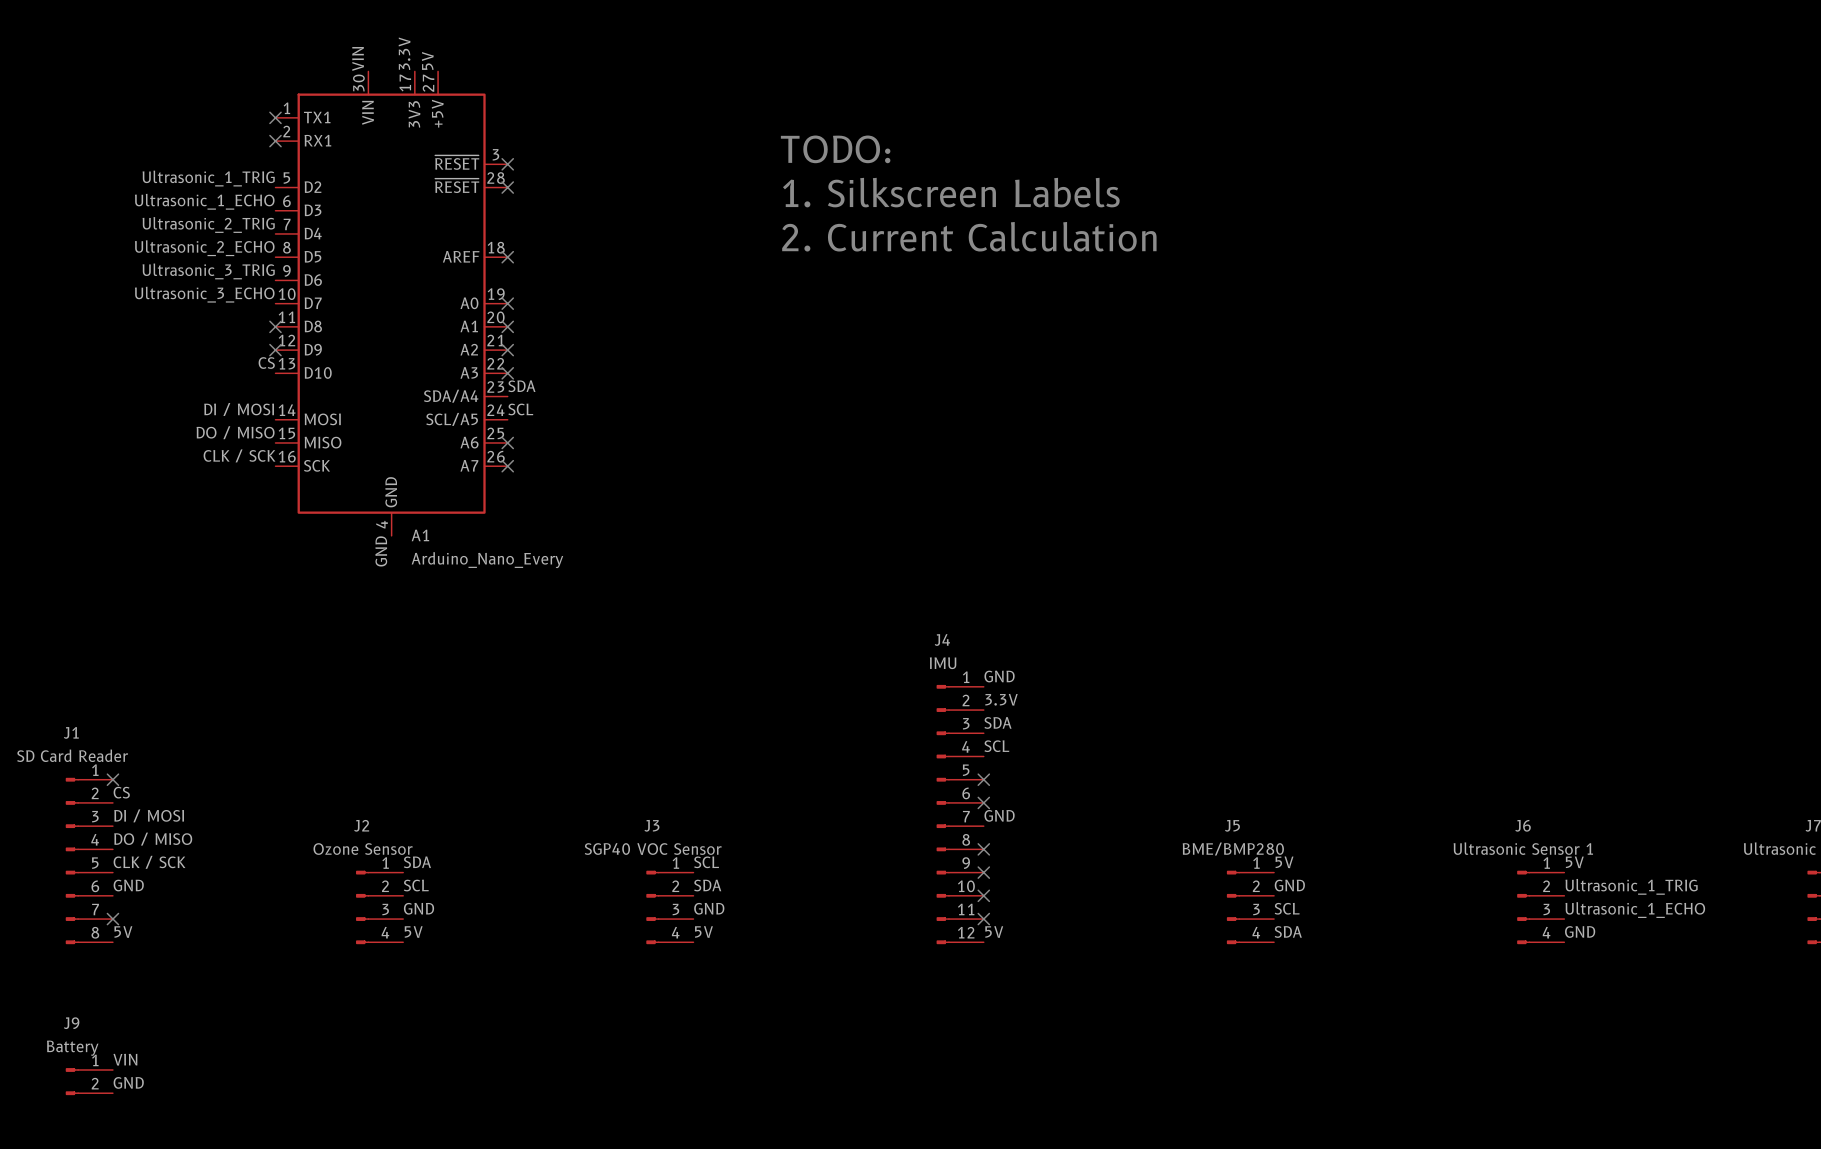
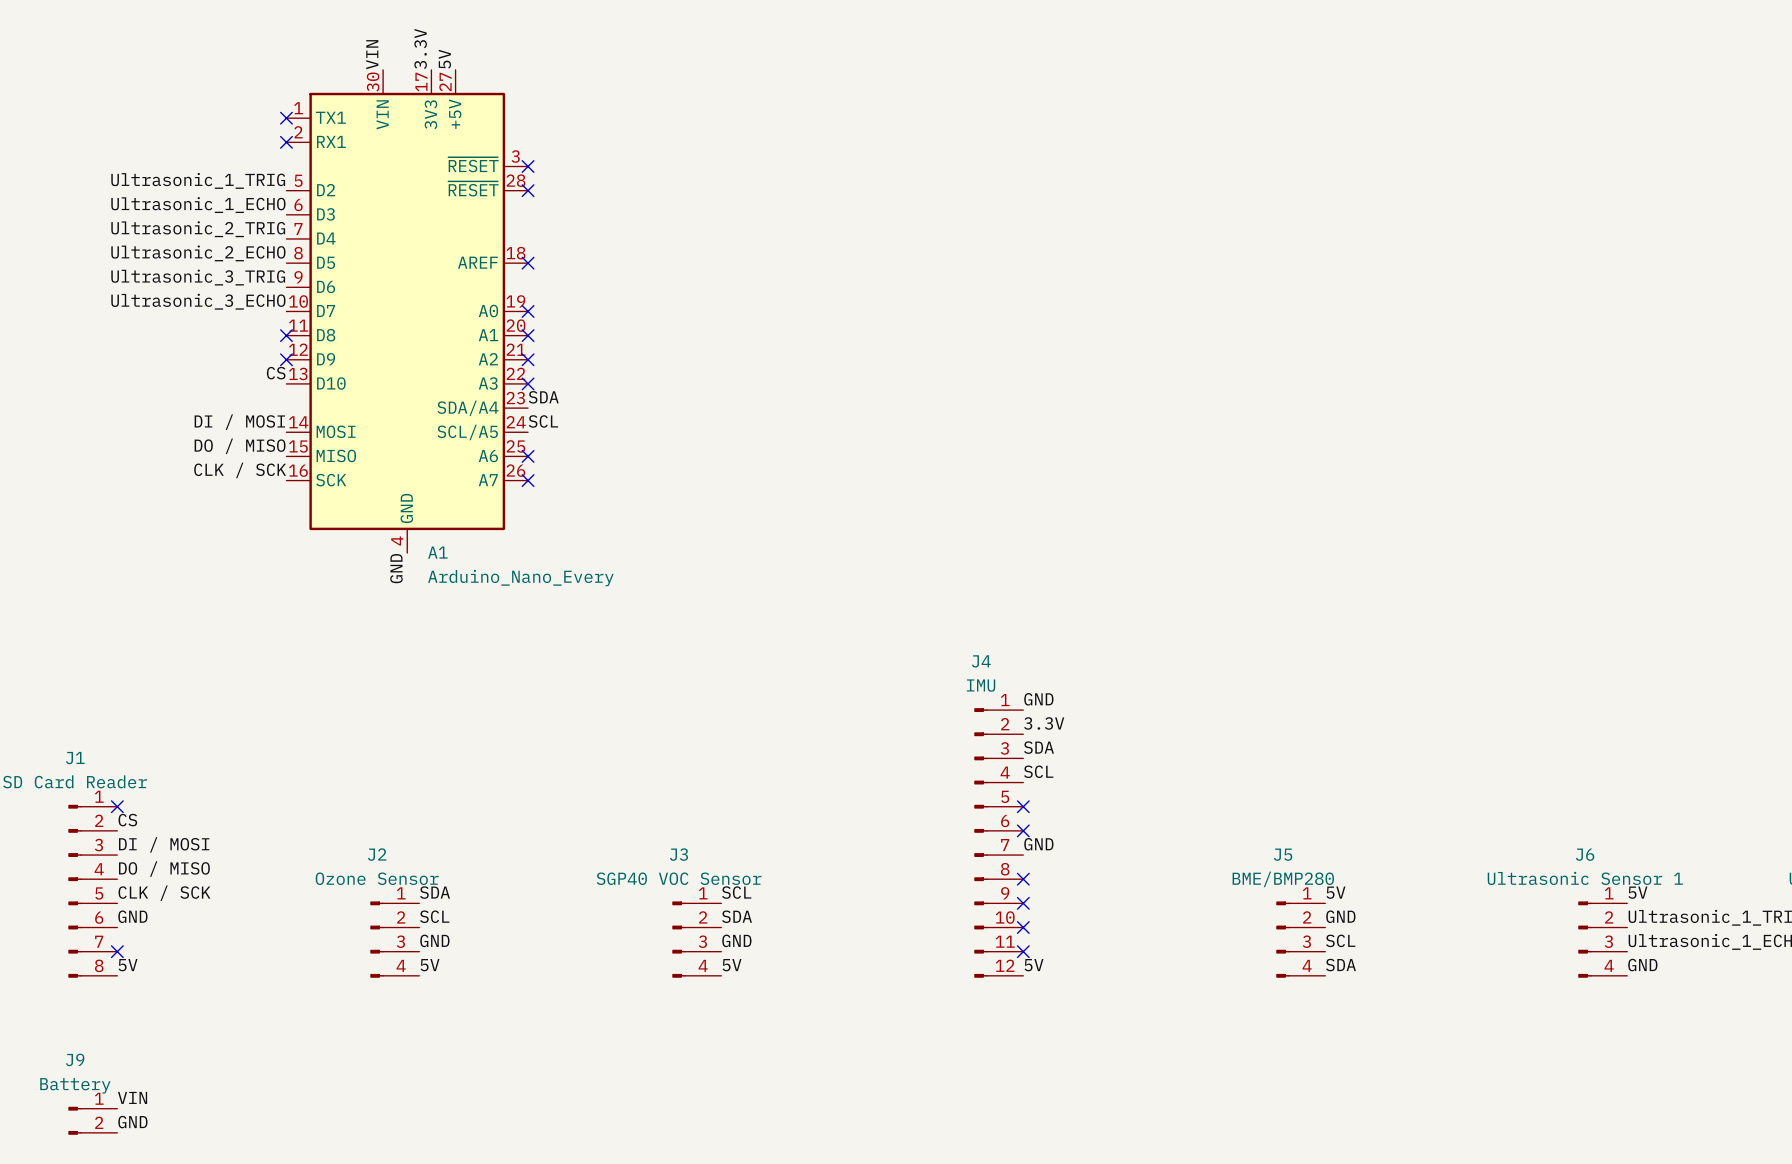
text: TODO: (835, 149) -> none
text: 1. Silkscreen Labels (951, 192) -> none
text: 2. Current Calculation (969, 236) -> none

